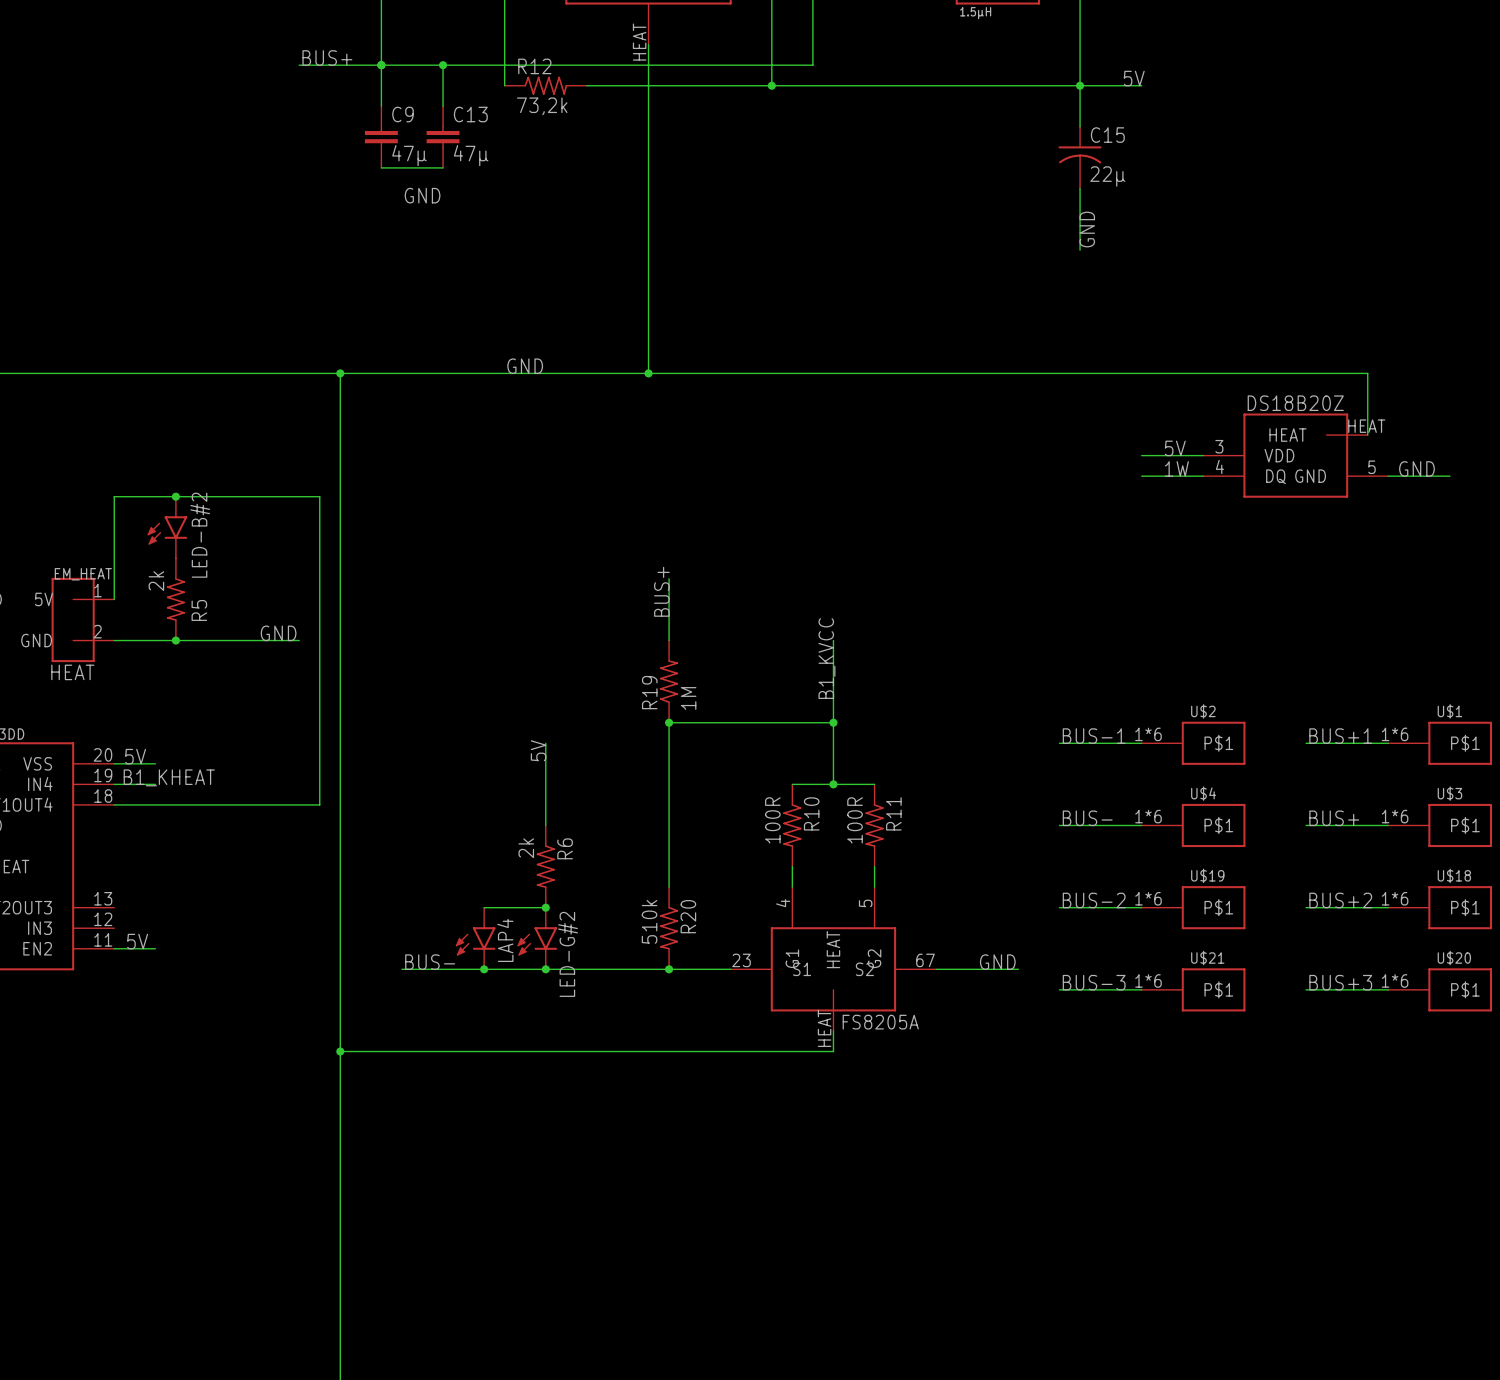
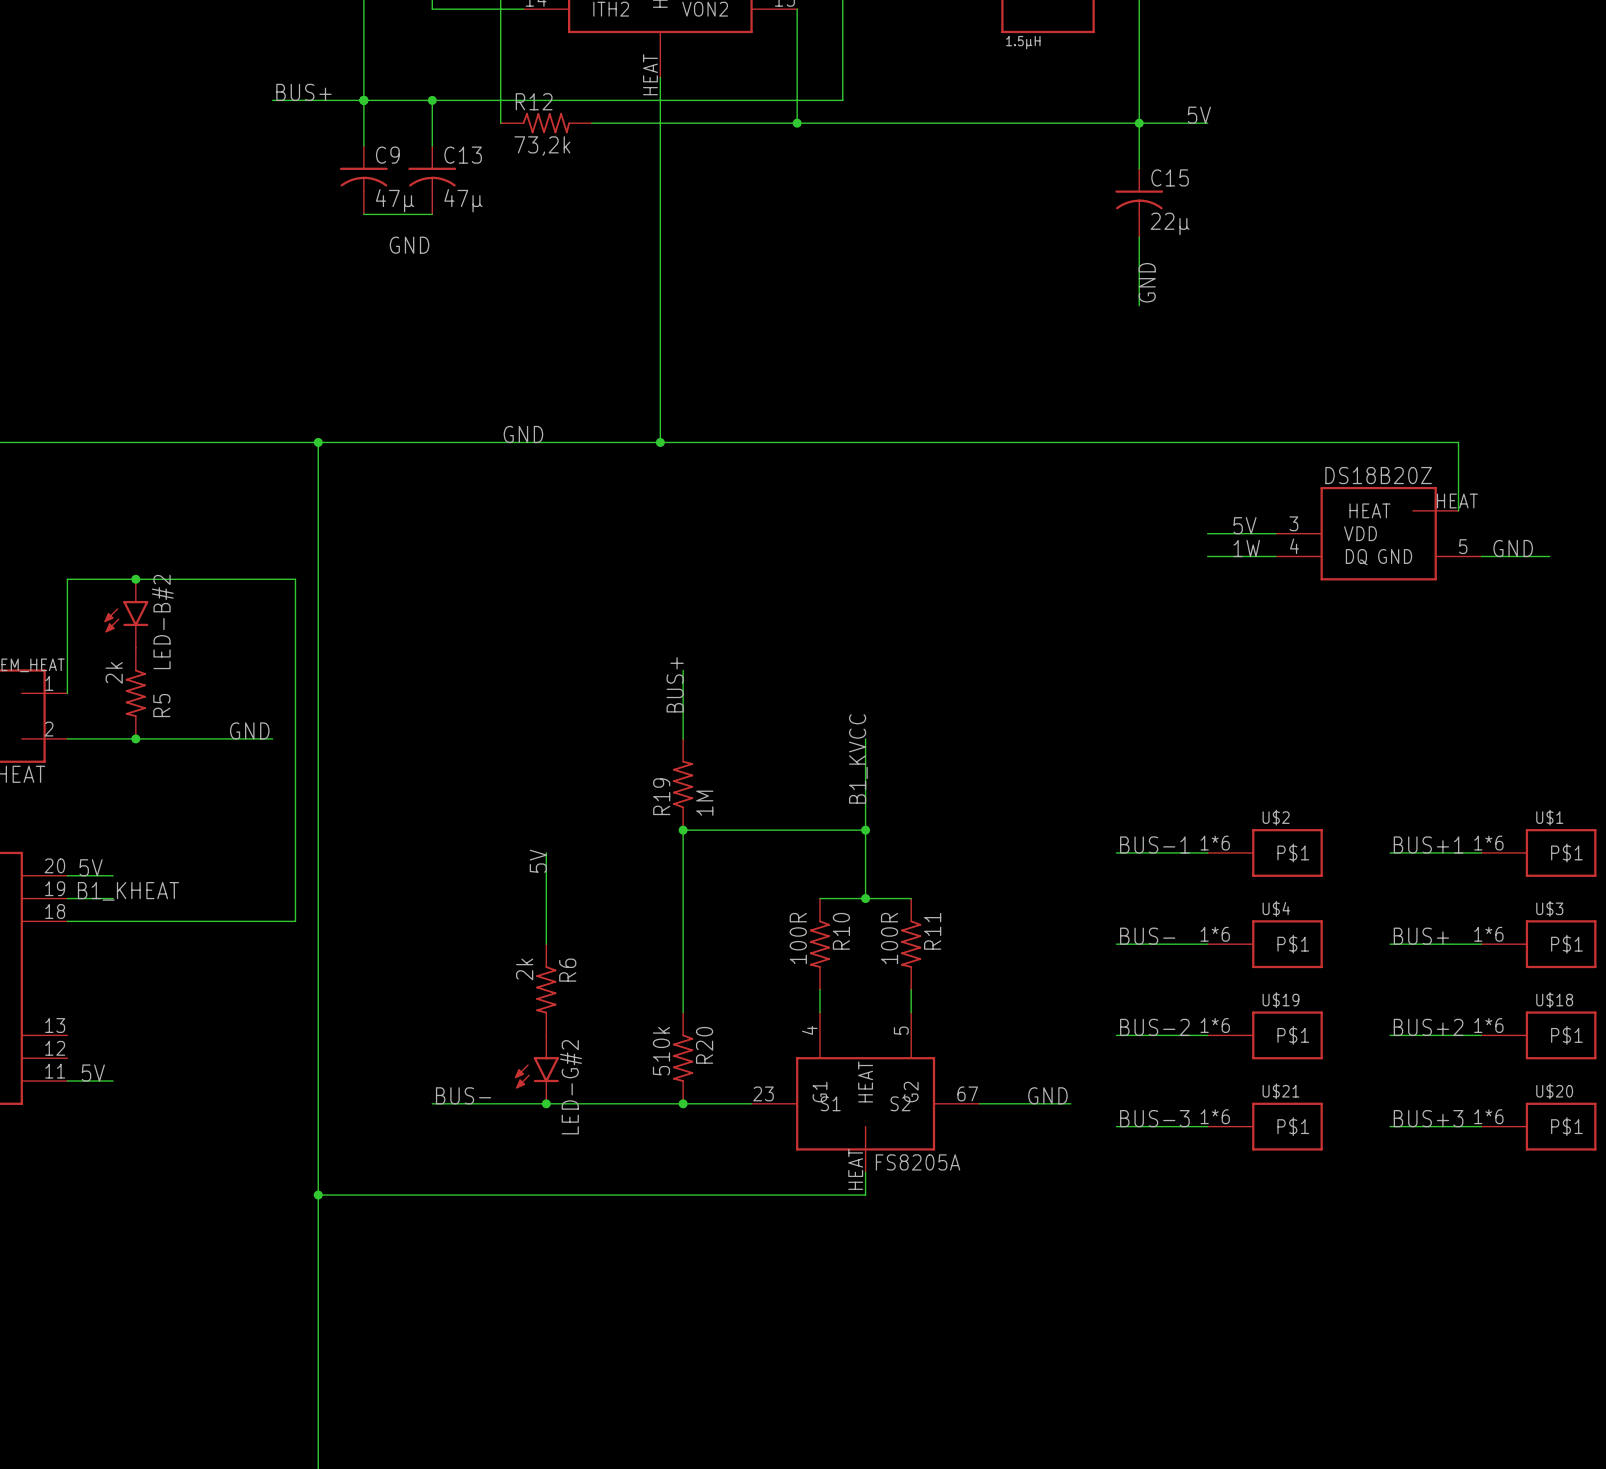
C9 symbol: [364, 106, 398, 168] -> [339, 146, 388, 215]
C13 symbol: [426, 106, 460, 168] -> [408, 146, 457, 215]
wire: (484, 907) (545, 907) -> none
junction: (545, 907) -> none
LAP4: (475, 938) -> none
label position: BUS- (430, 962) -> BUS- (463, 1095)
wire: (401, 969) (443, 969) -> none
junction: (484, 969) -> none

